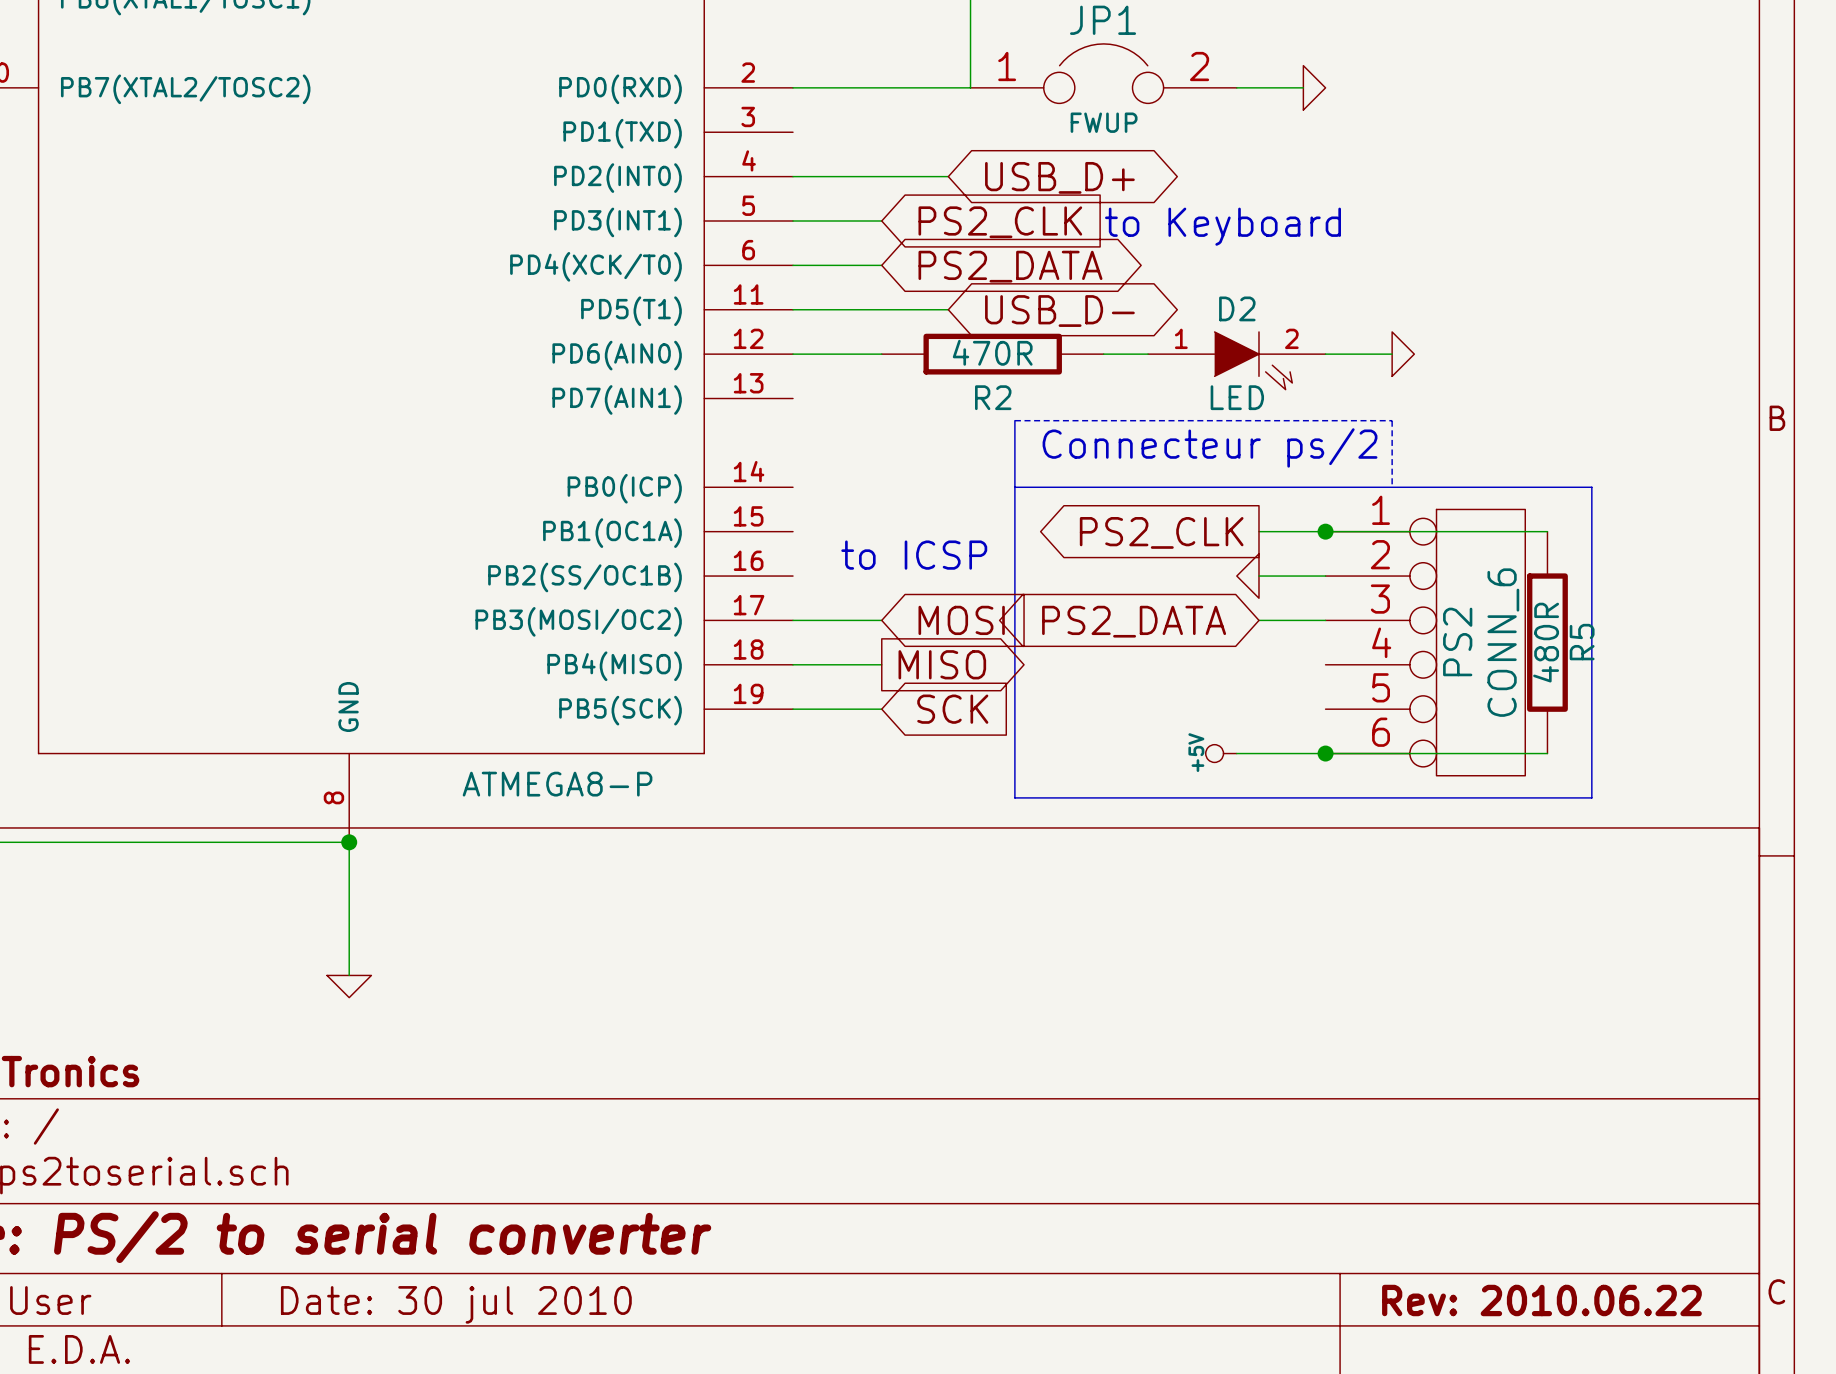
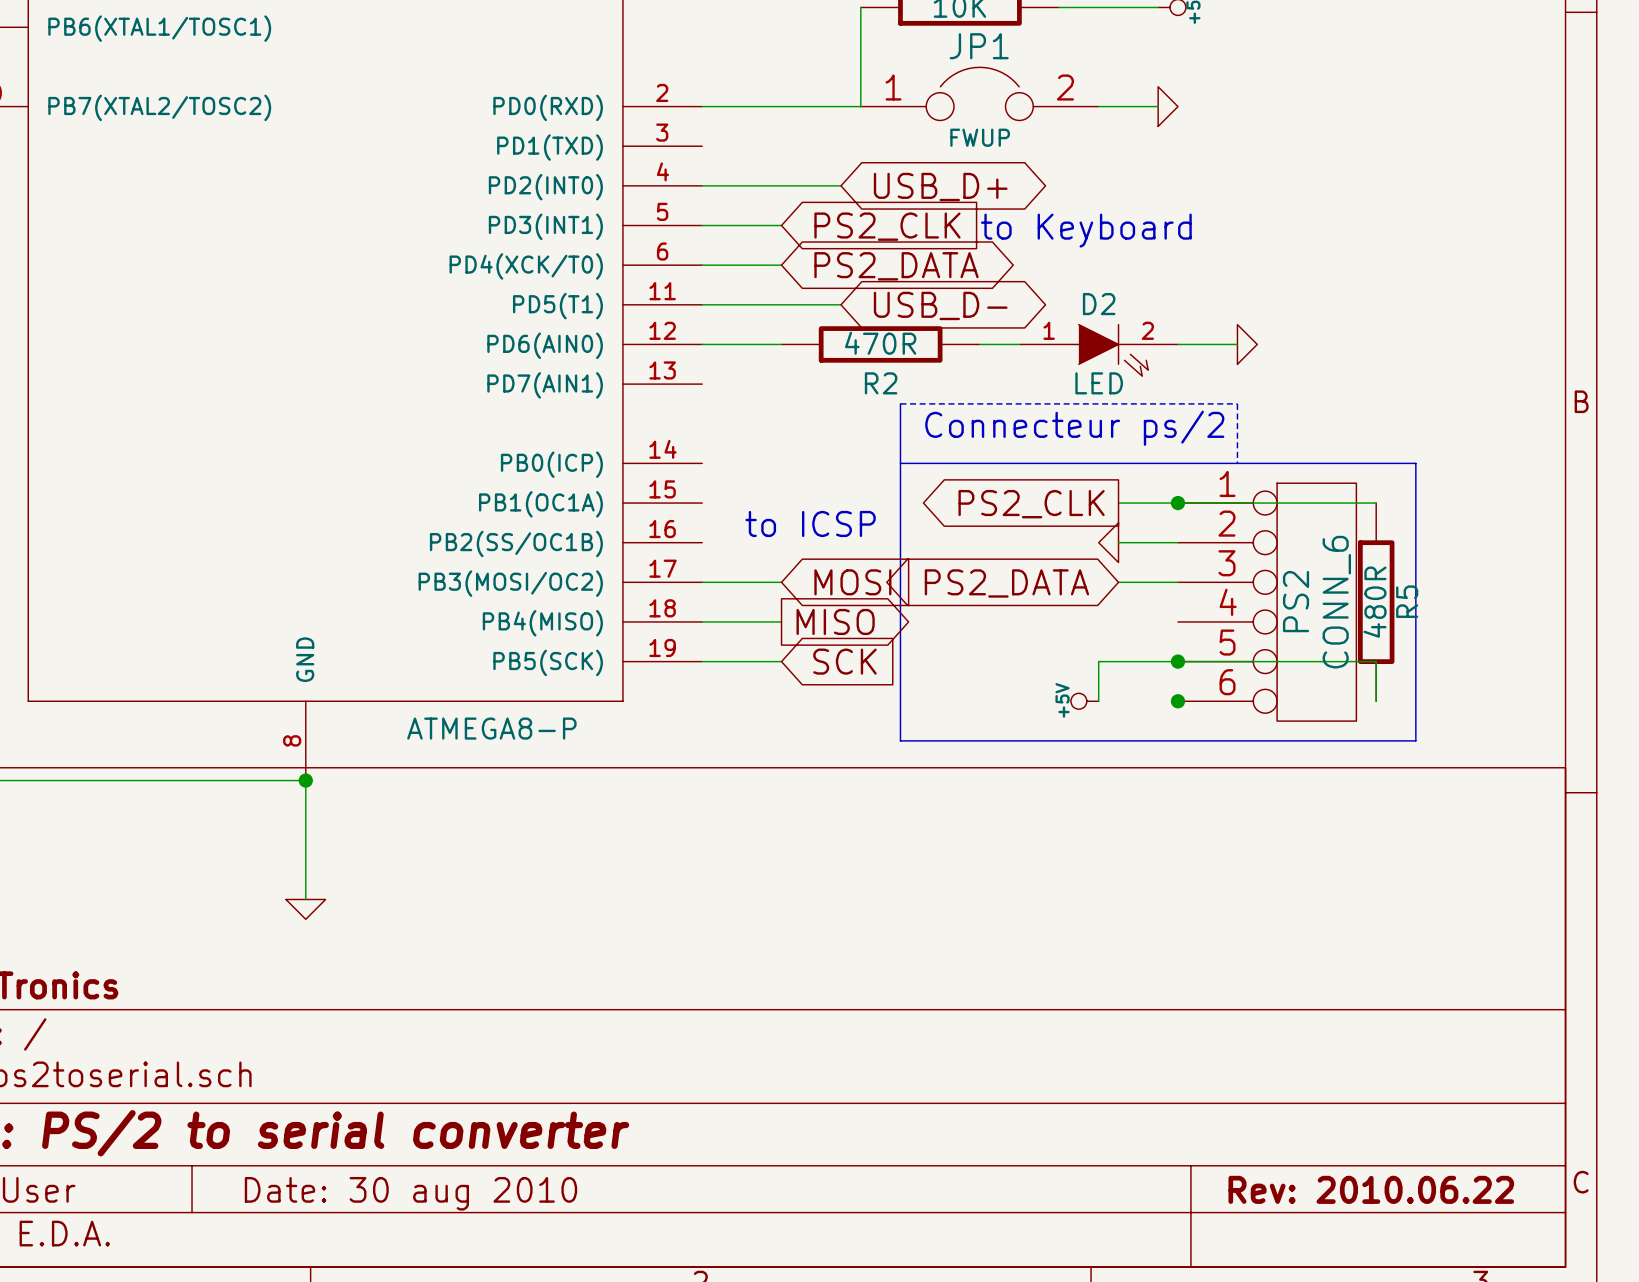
junction: none -> (1177, 661)
wire: (1236, 753) (1547, 753) -> (1098, 701) (1098, 661) (1376, 661) (1376, 701)
title block: Date: 30 jul 2010 (456, 1304) -> Date: 30 aug 2010 (410, 1193)

